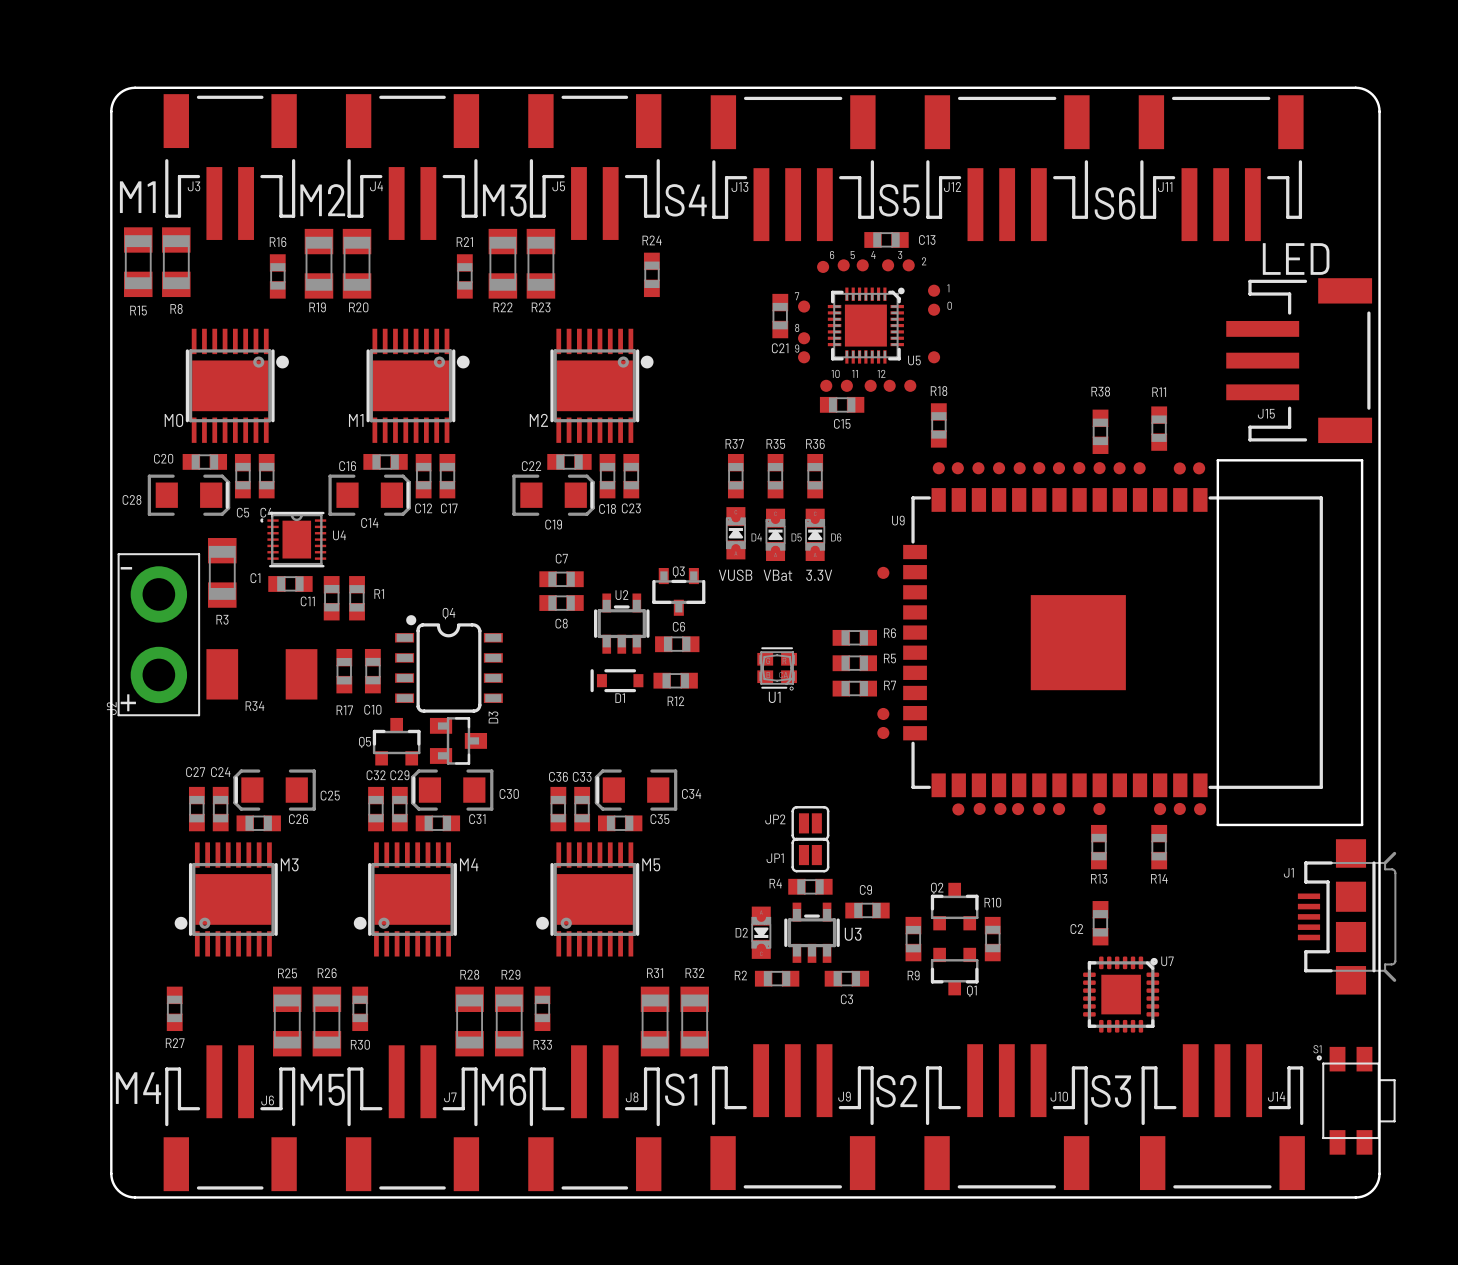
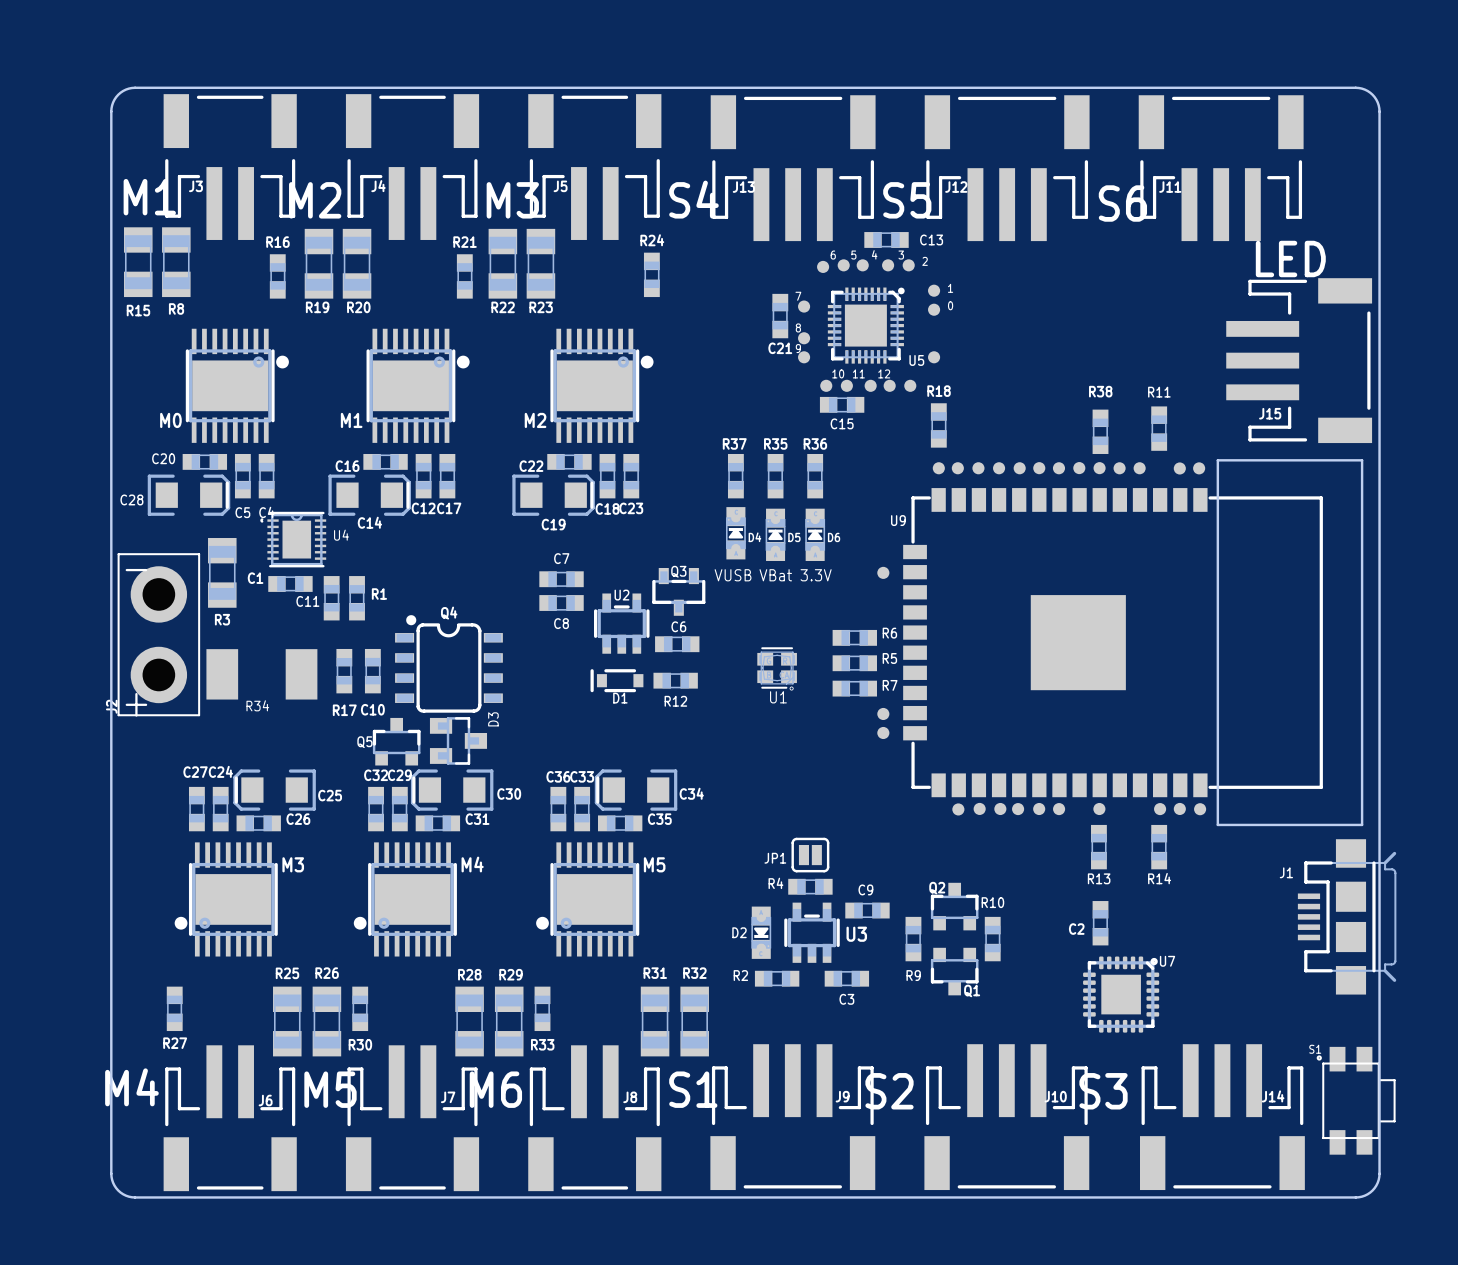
JP2: (810, 823) -> none

